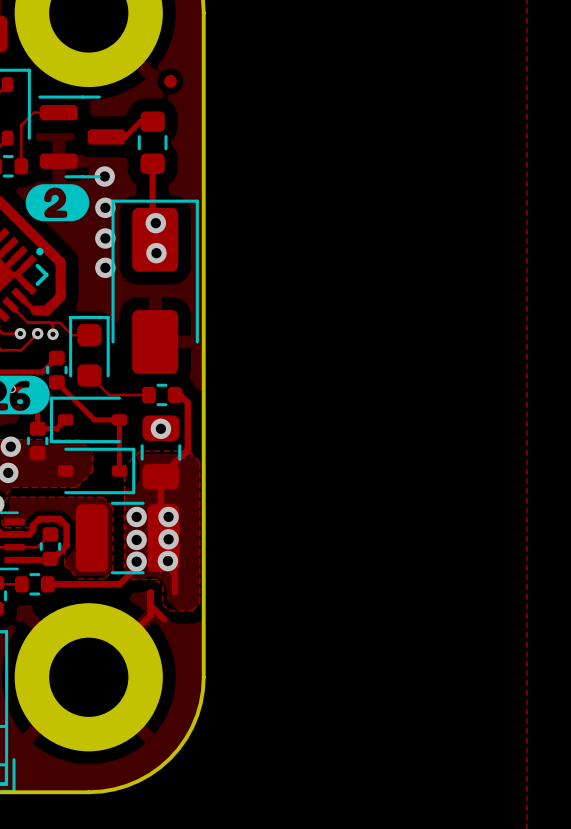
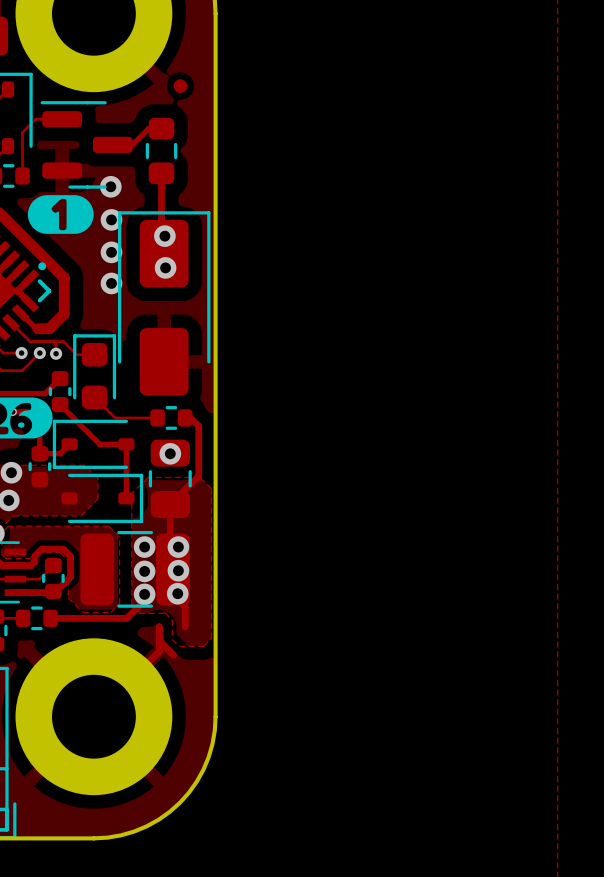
drawing shape: [25, 184, 90, 222] -> [27, 195, 94, 234]

